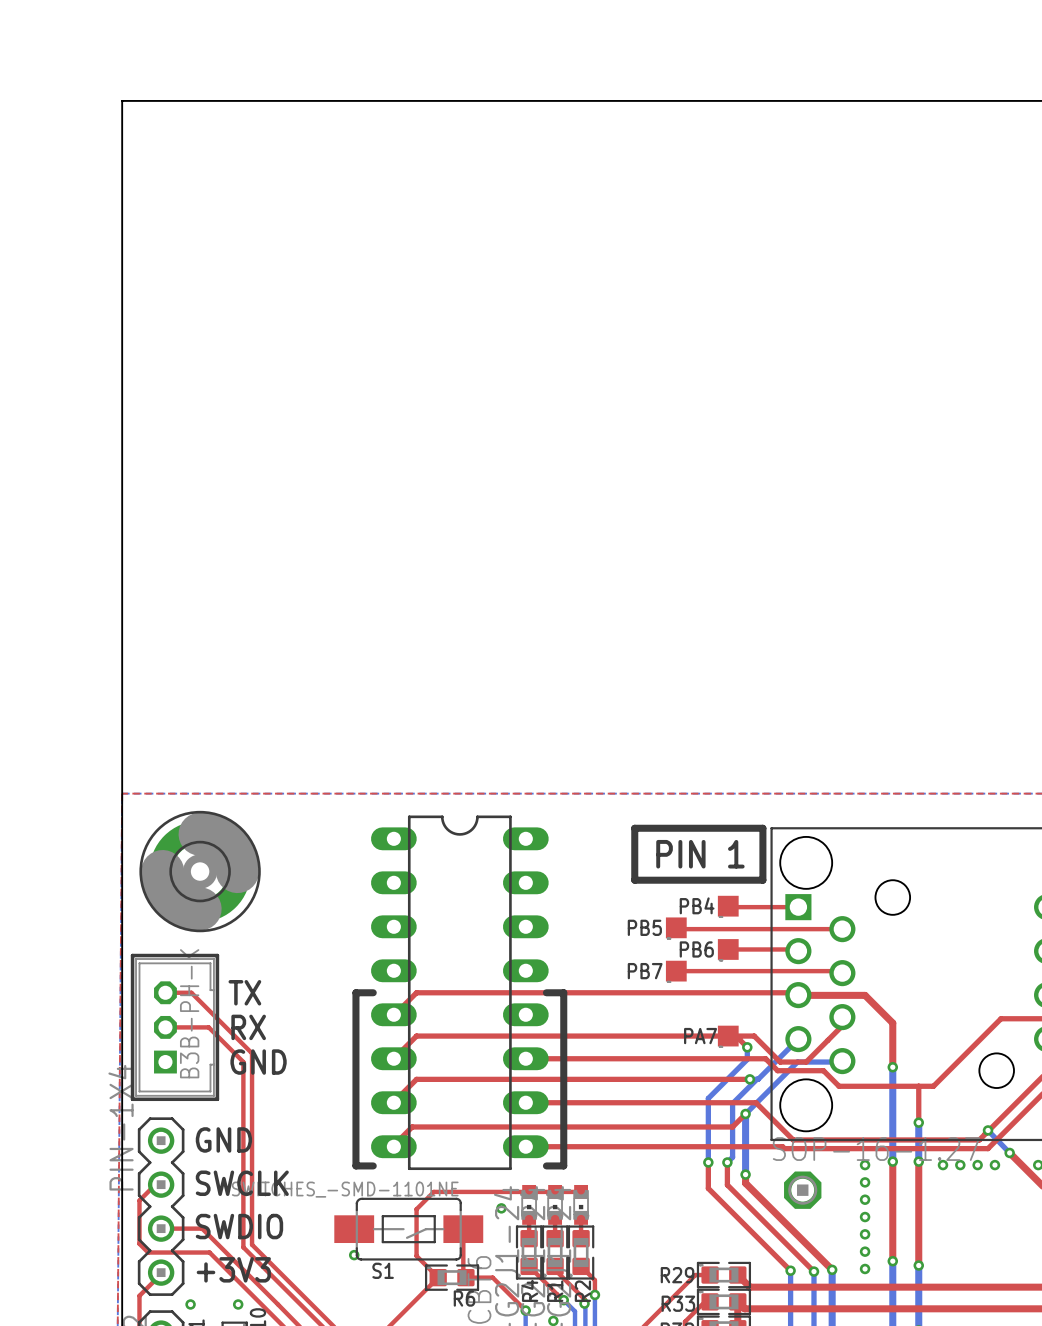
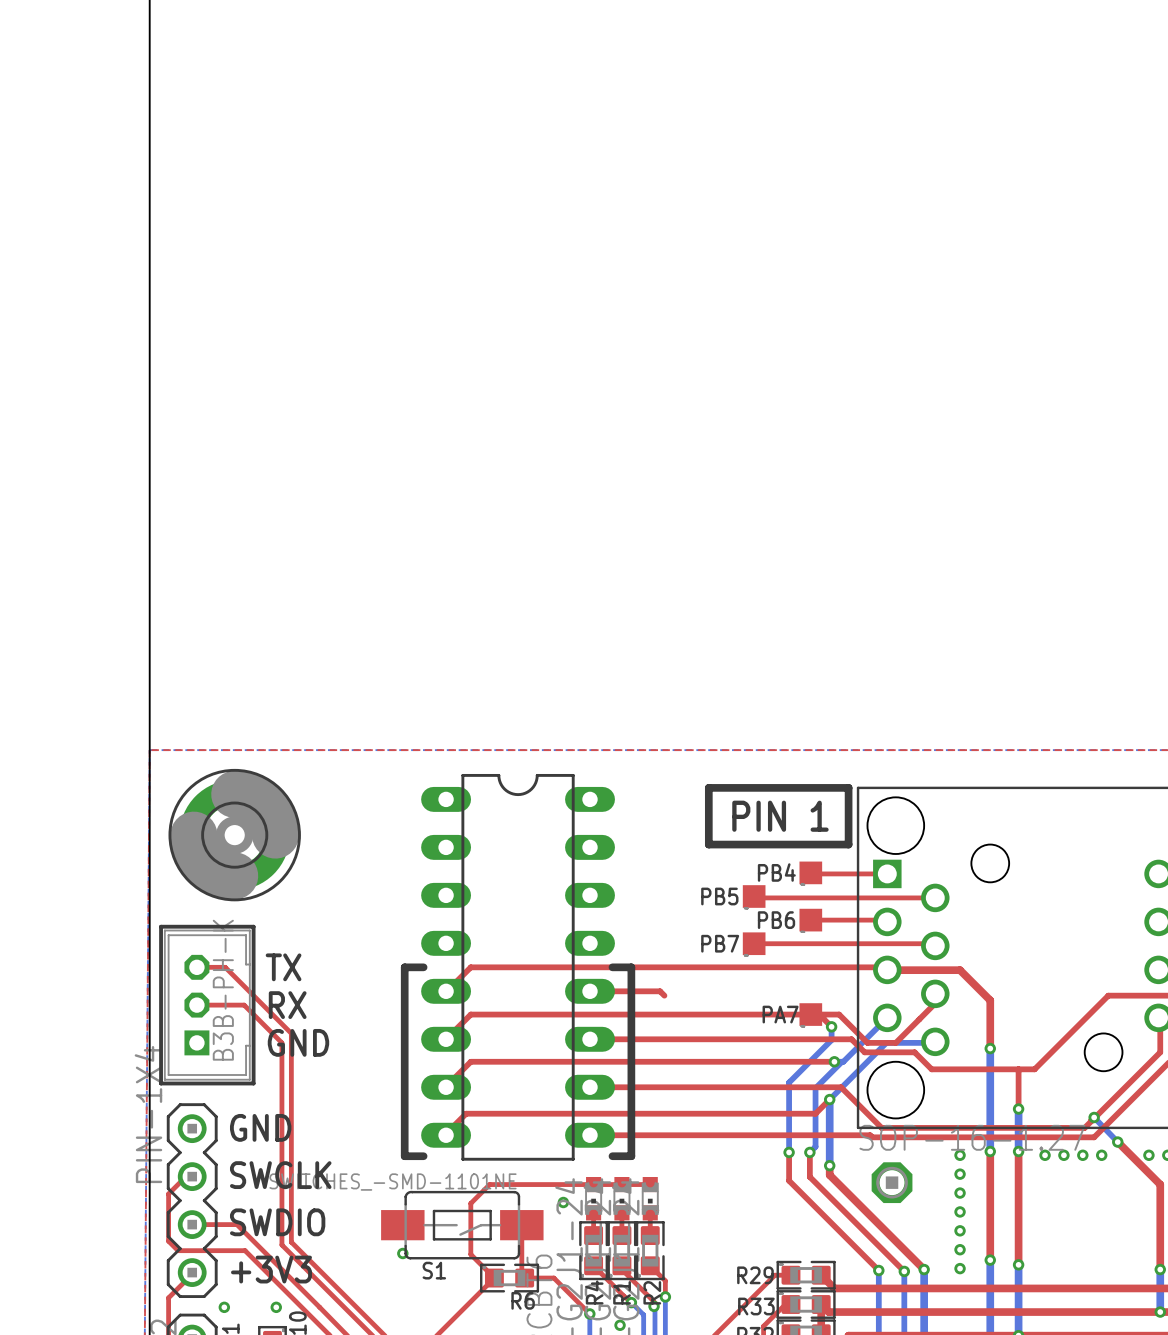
top track: none -> (590, 991) (660, 991) (664, 995)

